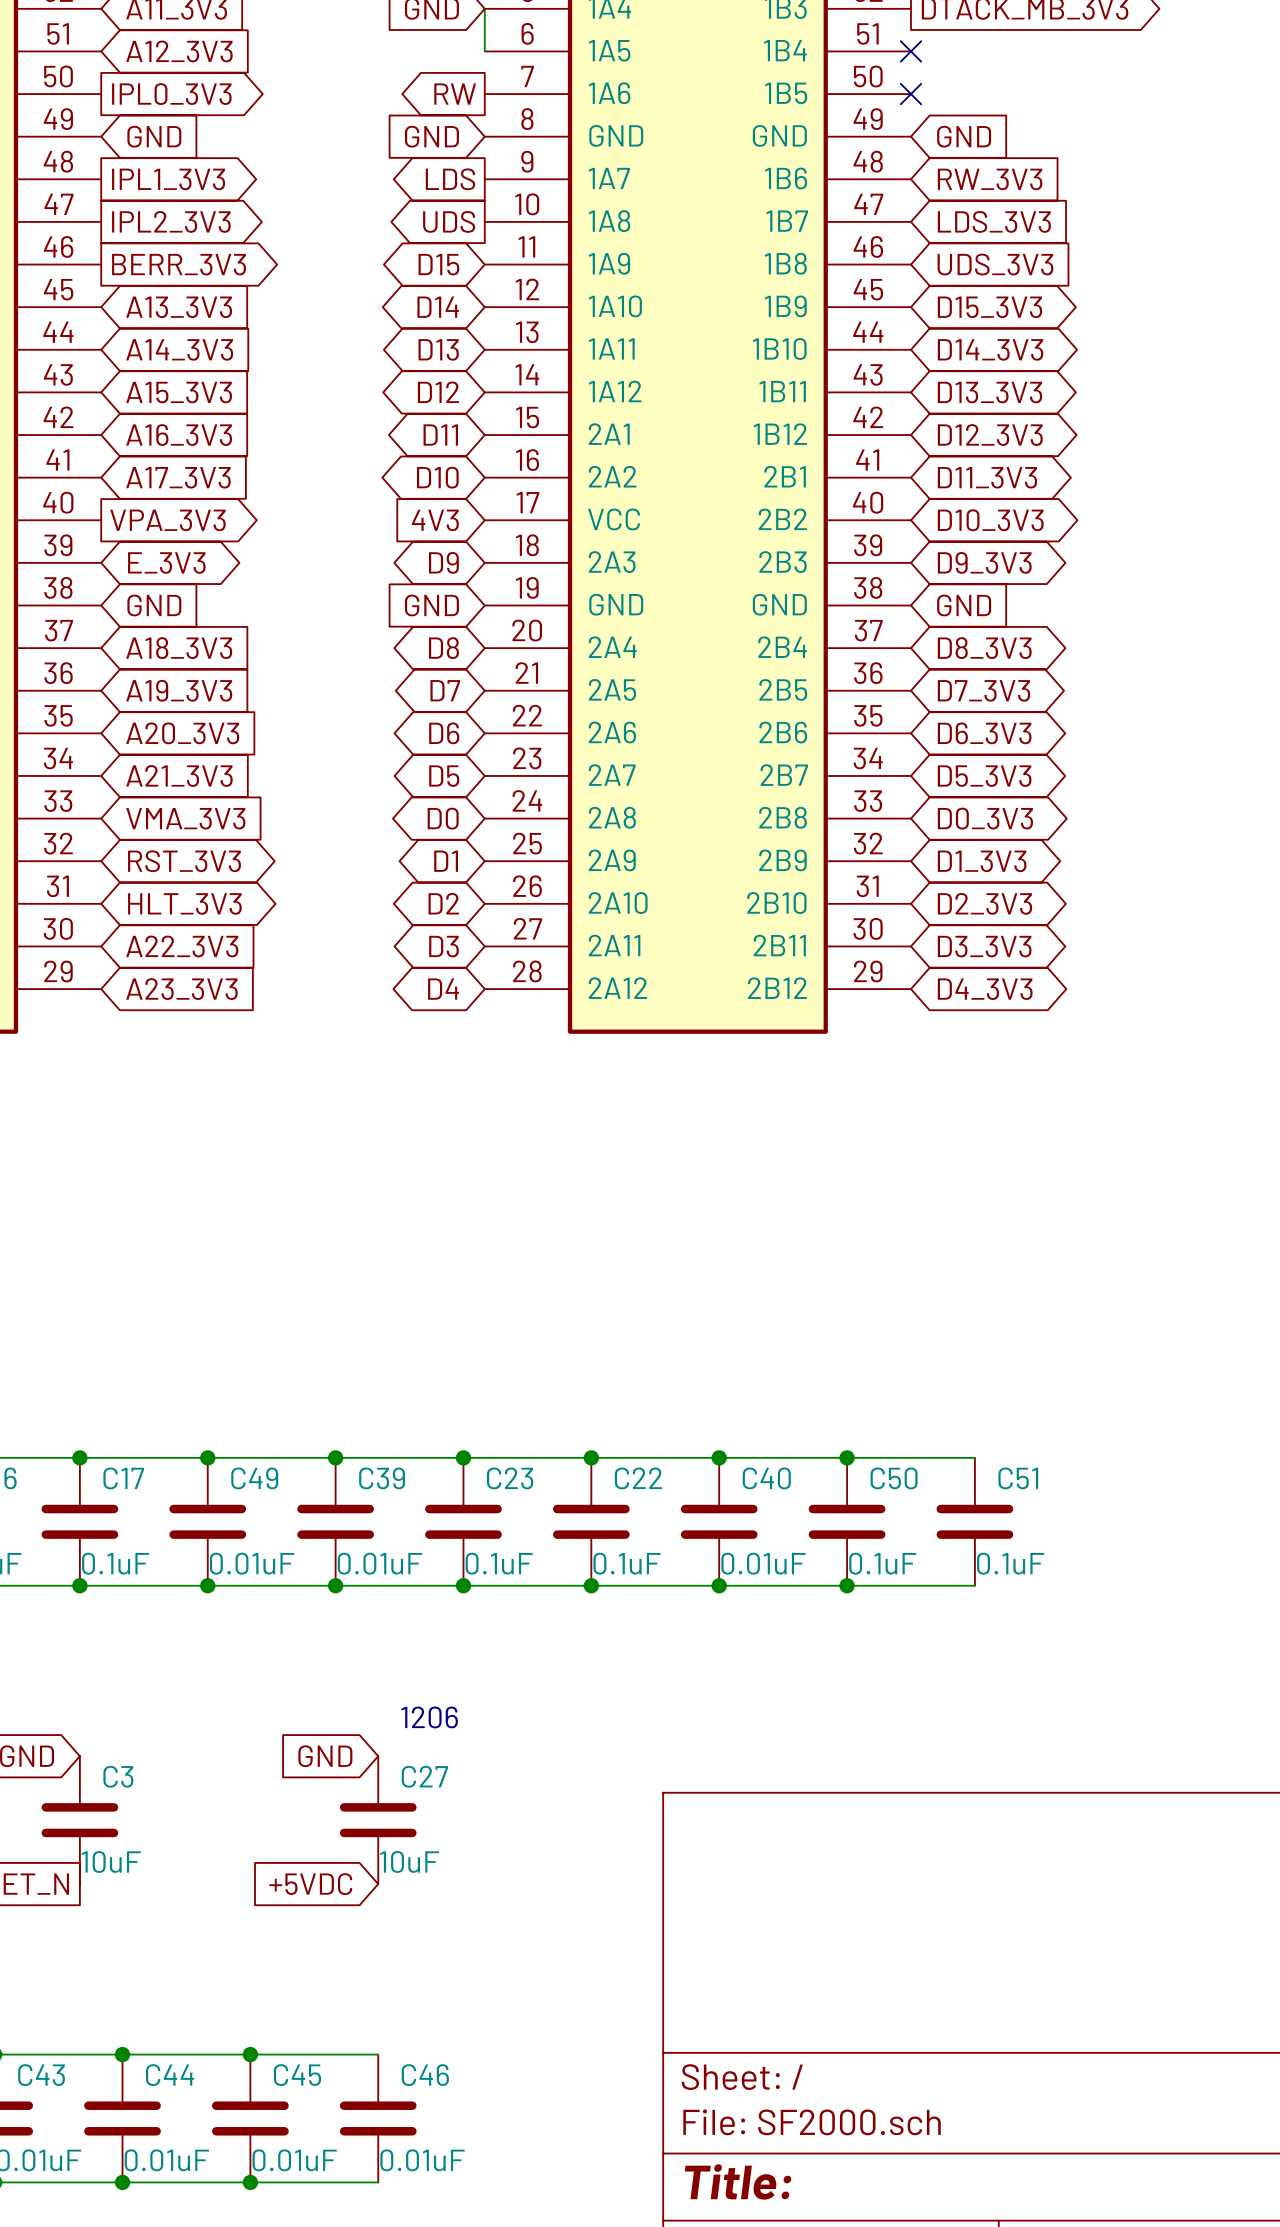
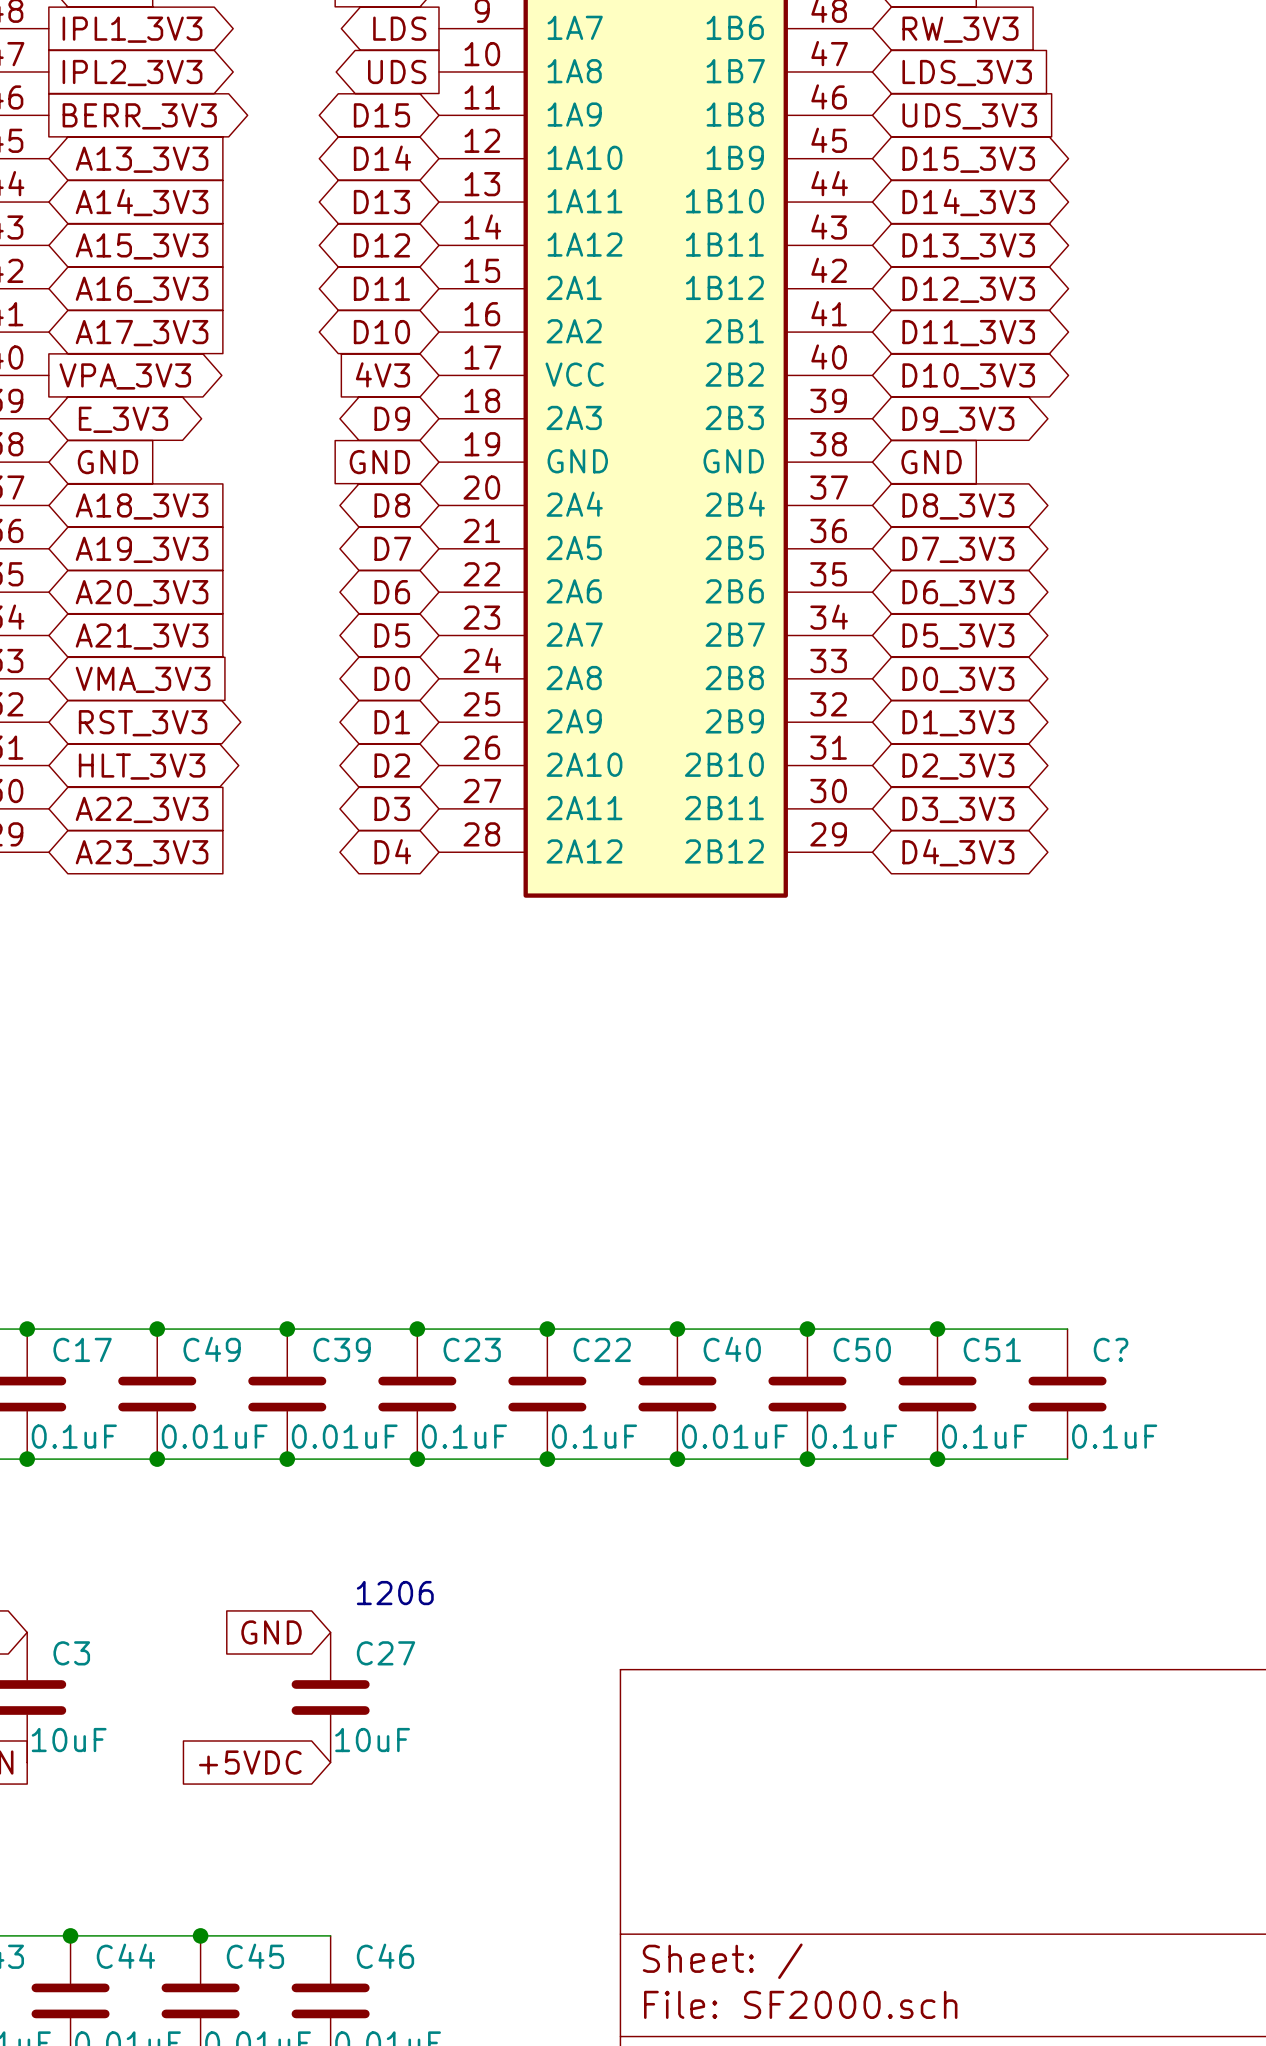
wire: none -> (937, 1329) (1067, 1329)
junction: none -> (937, 1329)
C?: none -> 0.1uF (1067, 1394)
wire: none -> (937, 1459) (1067, 1459)
junction: none -> (937, 1459)

